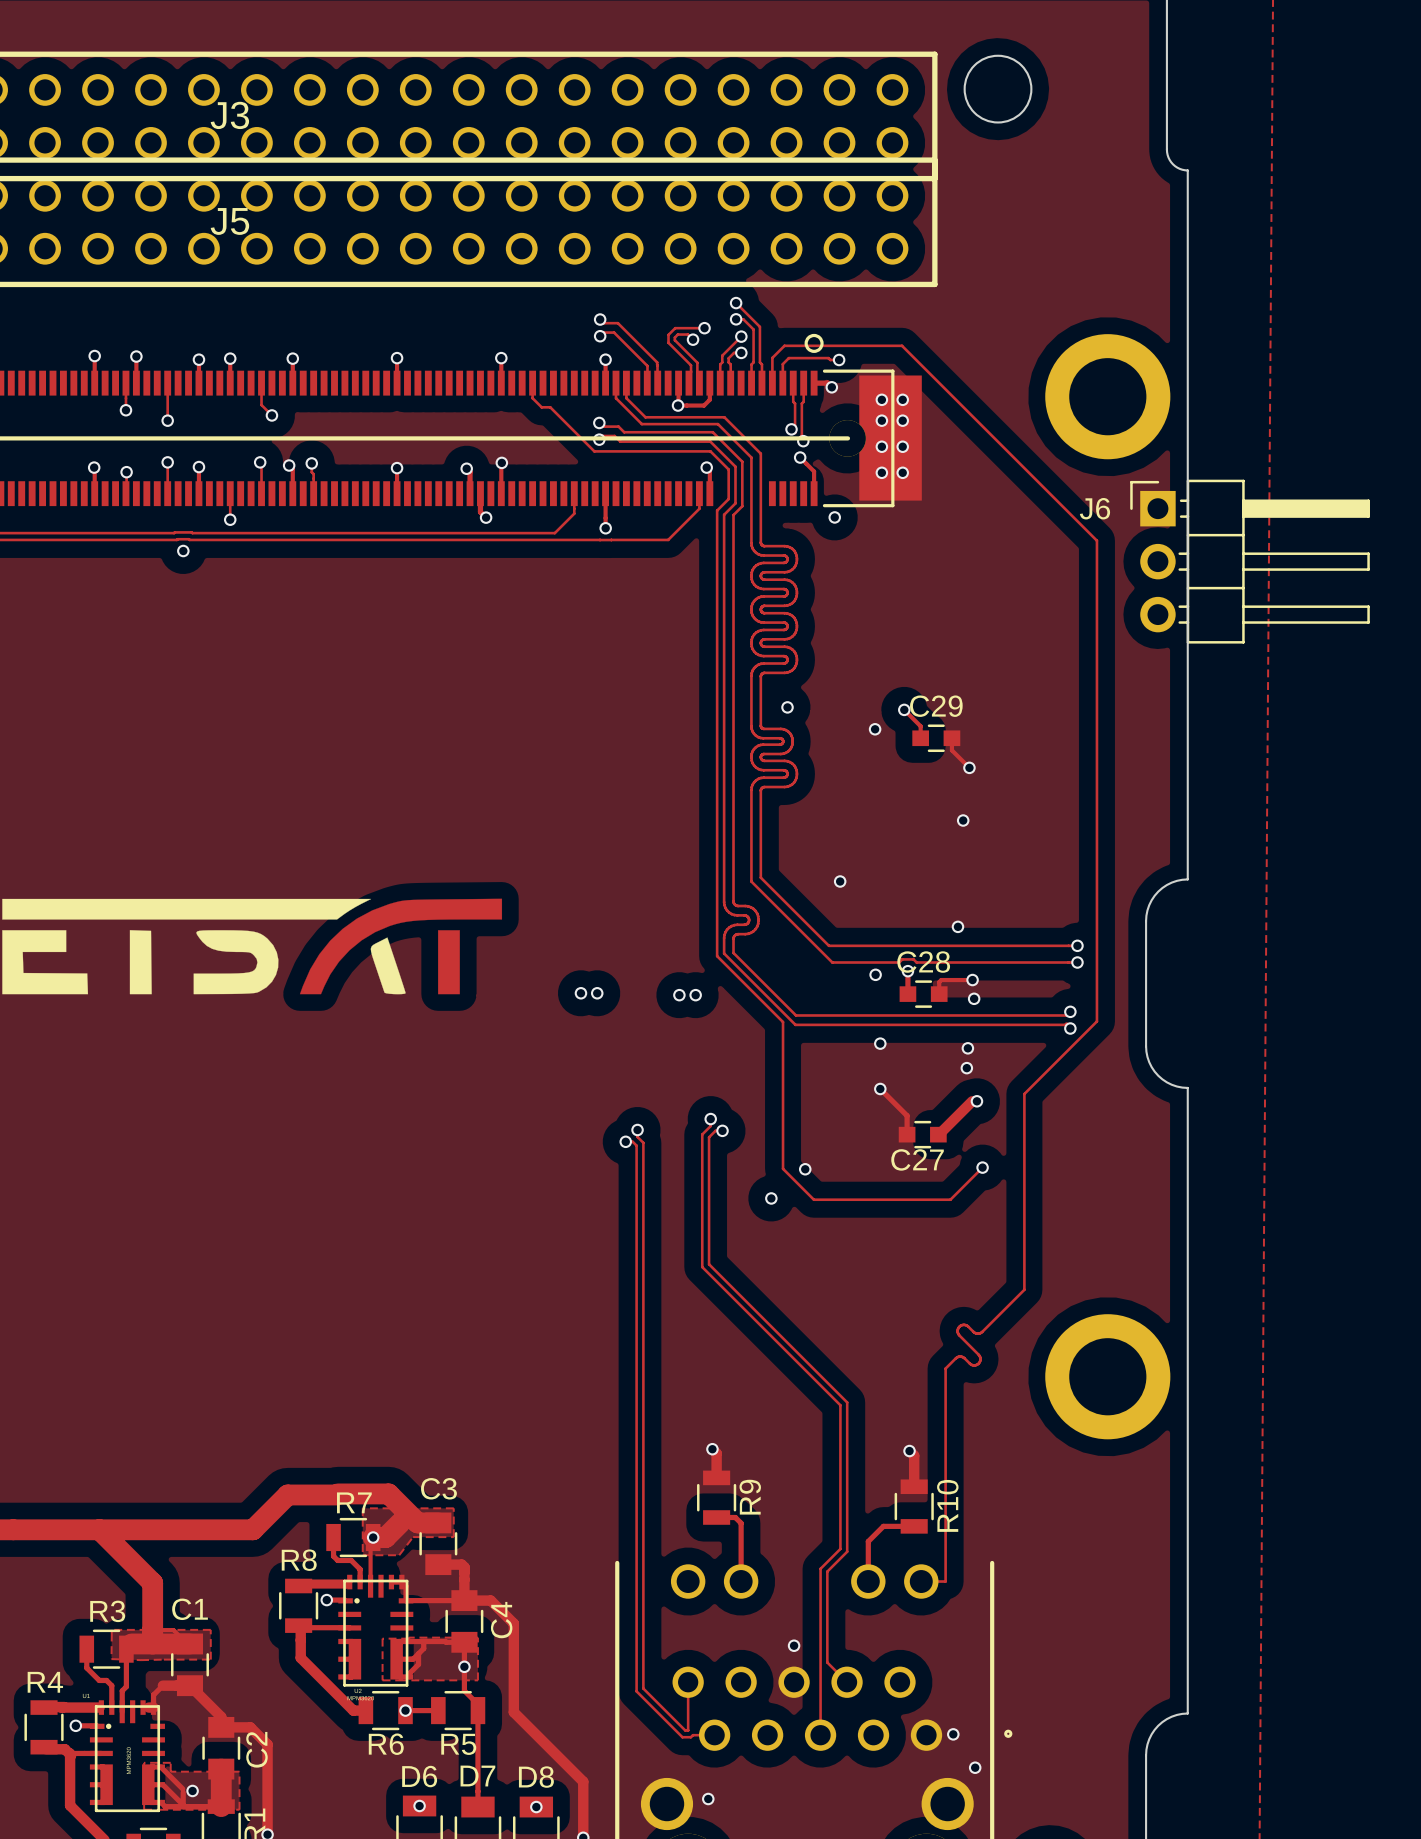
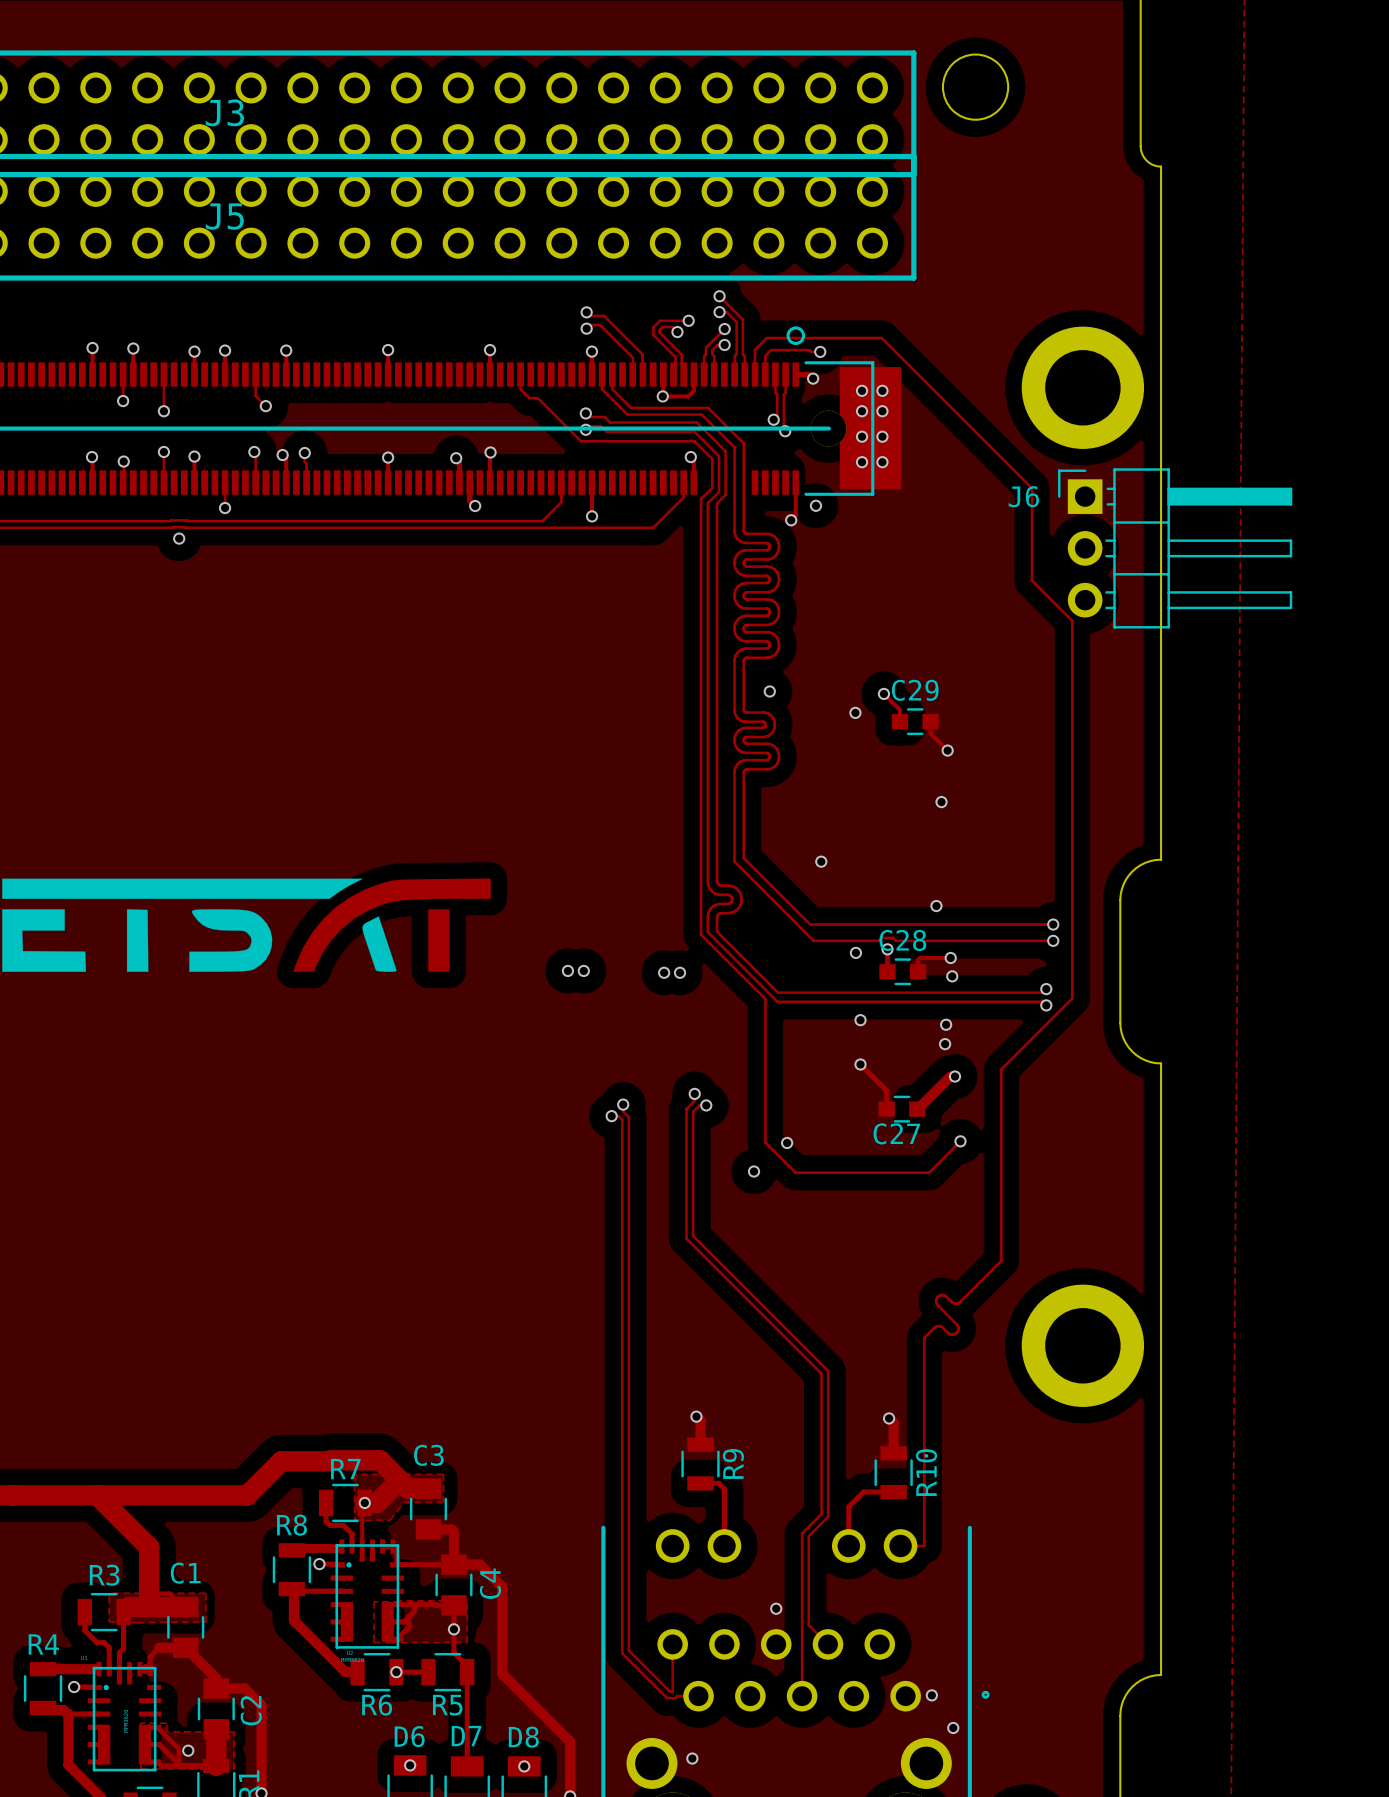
track: (800, 457) (814, 471) (814, 493) -> (791, 520) (795, 515) (795, 482)
via position: (800, 457) -> (791, 520)
track: (1055, 499) (1096, 540) (1096, 635) -> (1031, 488) (1031, 580) (1072, 620)
J6 position: (1250, 561) -> (1175, 548)

